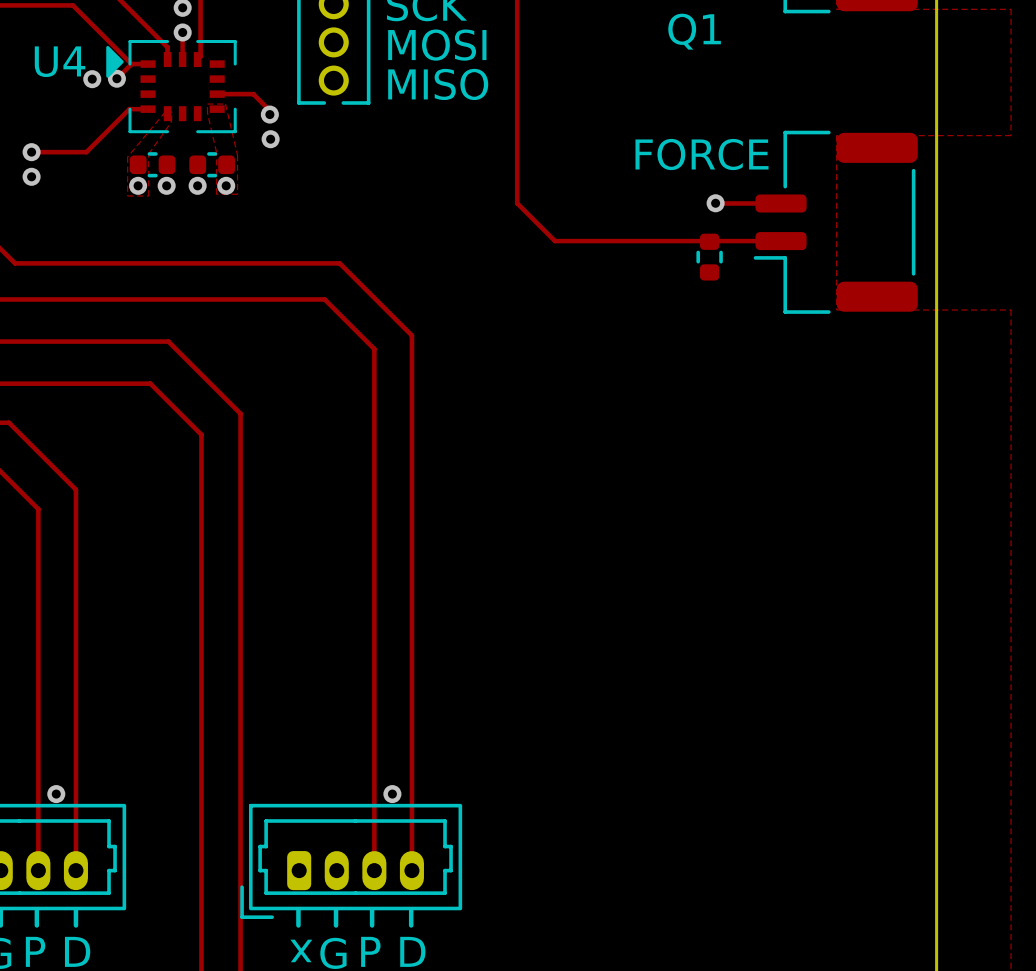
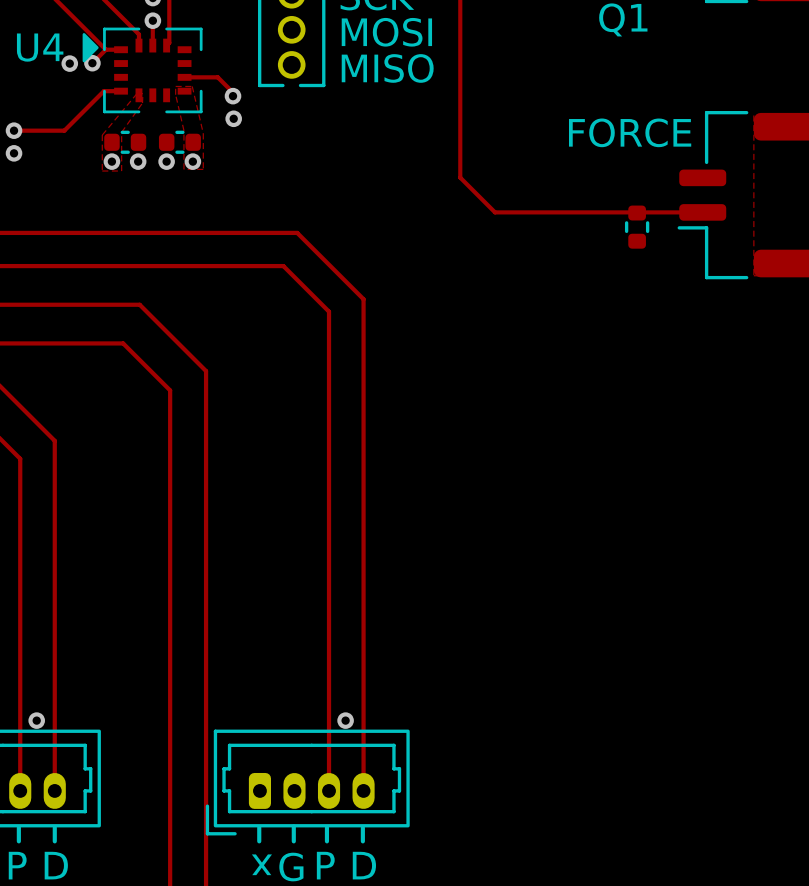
track: (715, 203) (781, 203) -> none
via: (715, 203) -> none

